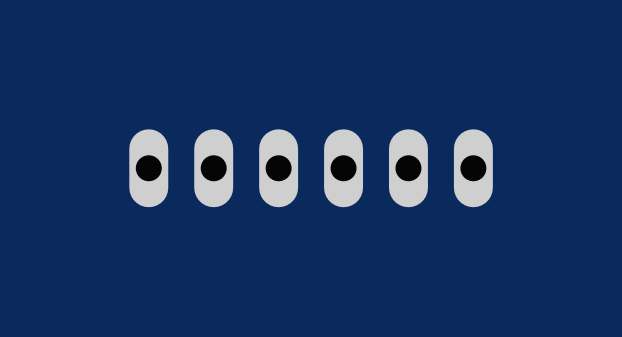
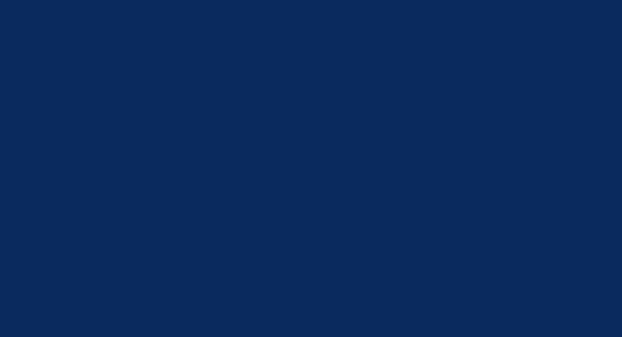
part: (311, 168) -> none

